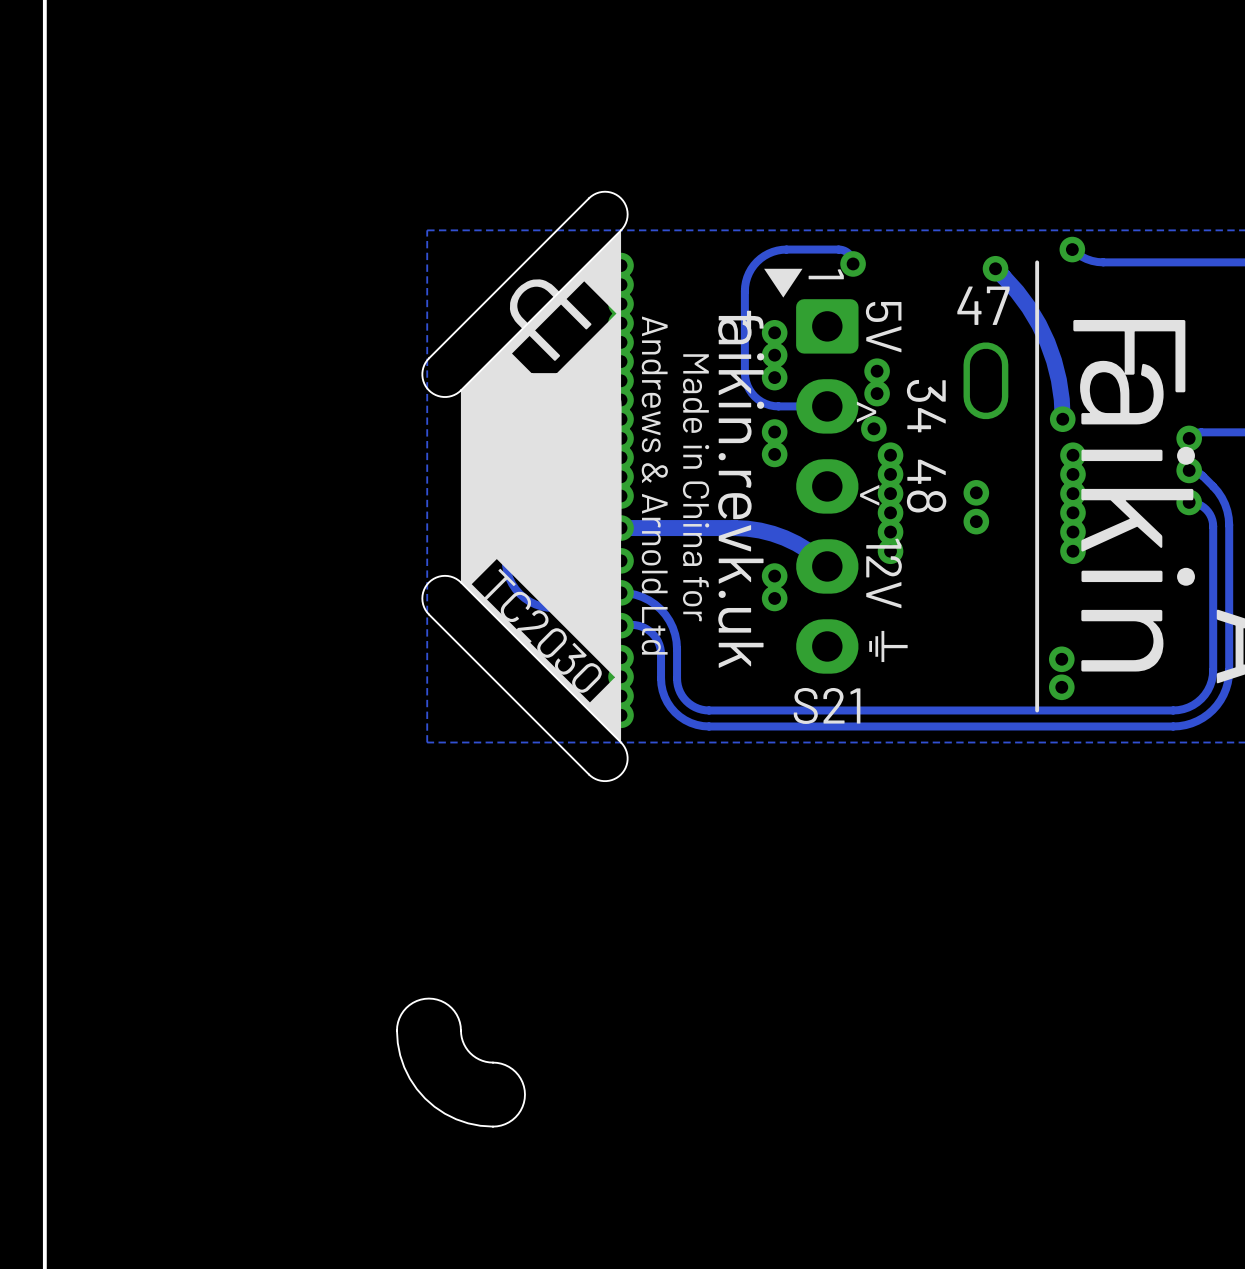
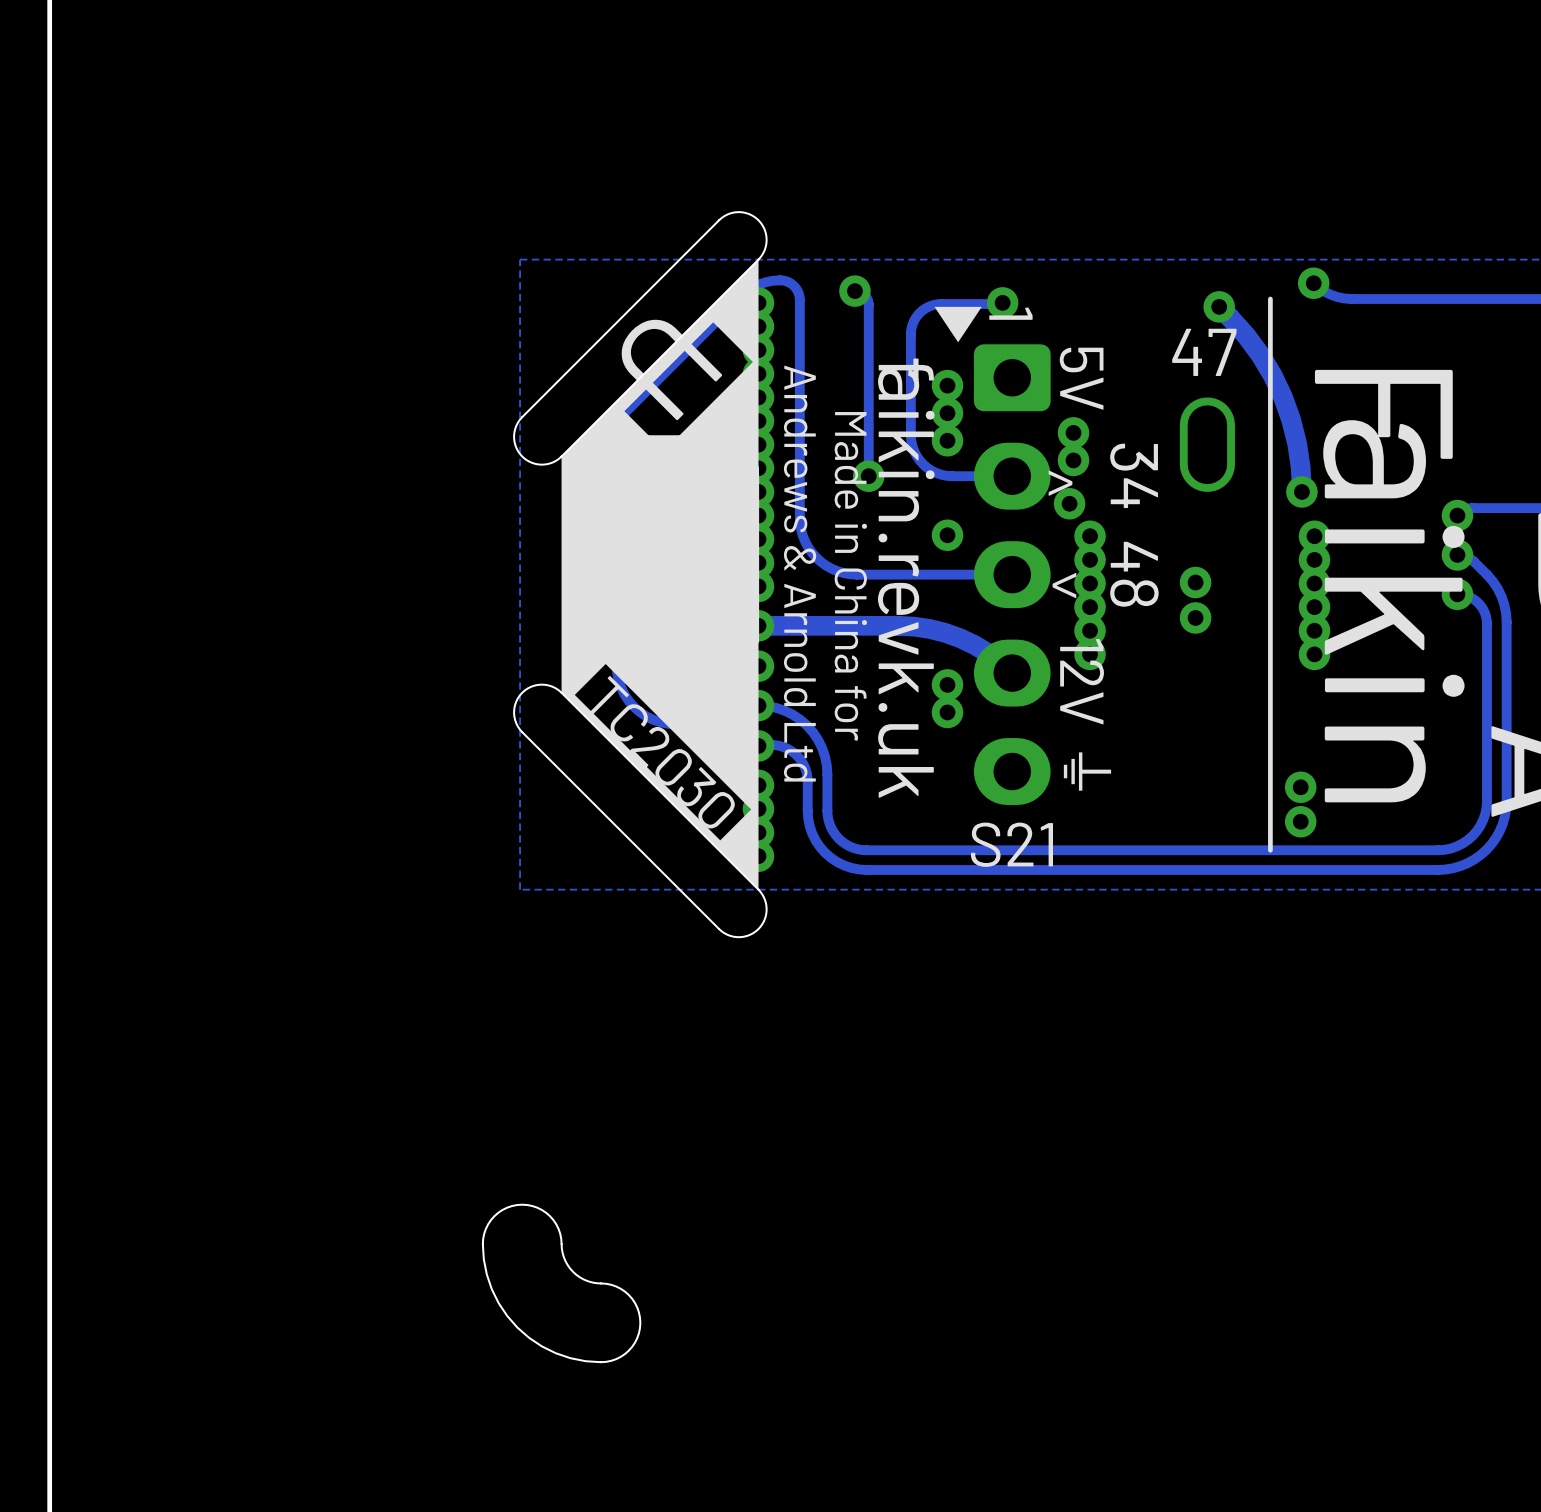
track: none -> (854, 291) (863, 293) (868, 303) (868, 476)
via: none -> (854, 291)
track: (853, 263) (850, 255) (840, 249) (777, 250) (764, 255) (753, 265) (747, 277) (744, 291) -> (1002, 302) (931, 305) (922, 310) (915, 318) (910, 334)
via position: (853, 263) -> (1002, 302)
via position: (774, 432) -> (868, 476)
track: none -> (1012, 574) (850, 574) (832, 568) (812, 553) (803, 536) (799, 517) (799, 297) (795, 288) (789, 282) (782, 280) (773, 280) (752, 287) (741, 296) (601, 435) (589, 454) (585, 476) (585, 555) (590, 581) (599, 597) (612, 610) (628, 619) (654, 624)

